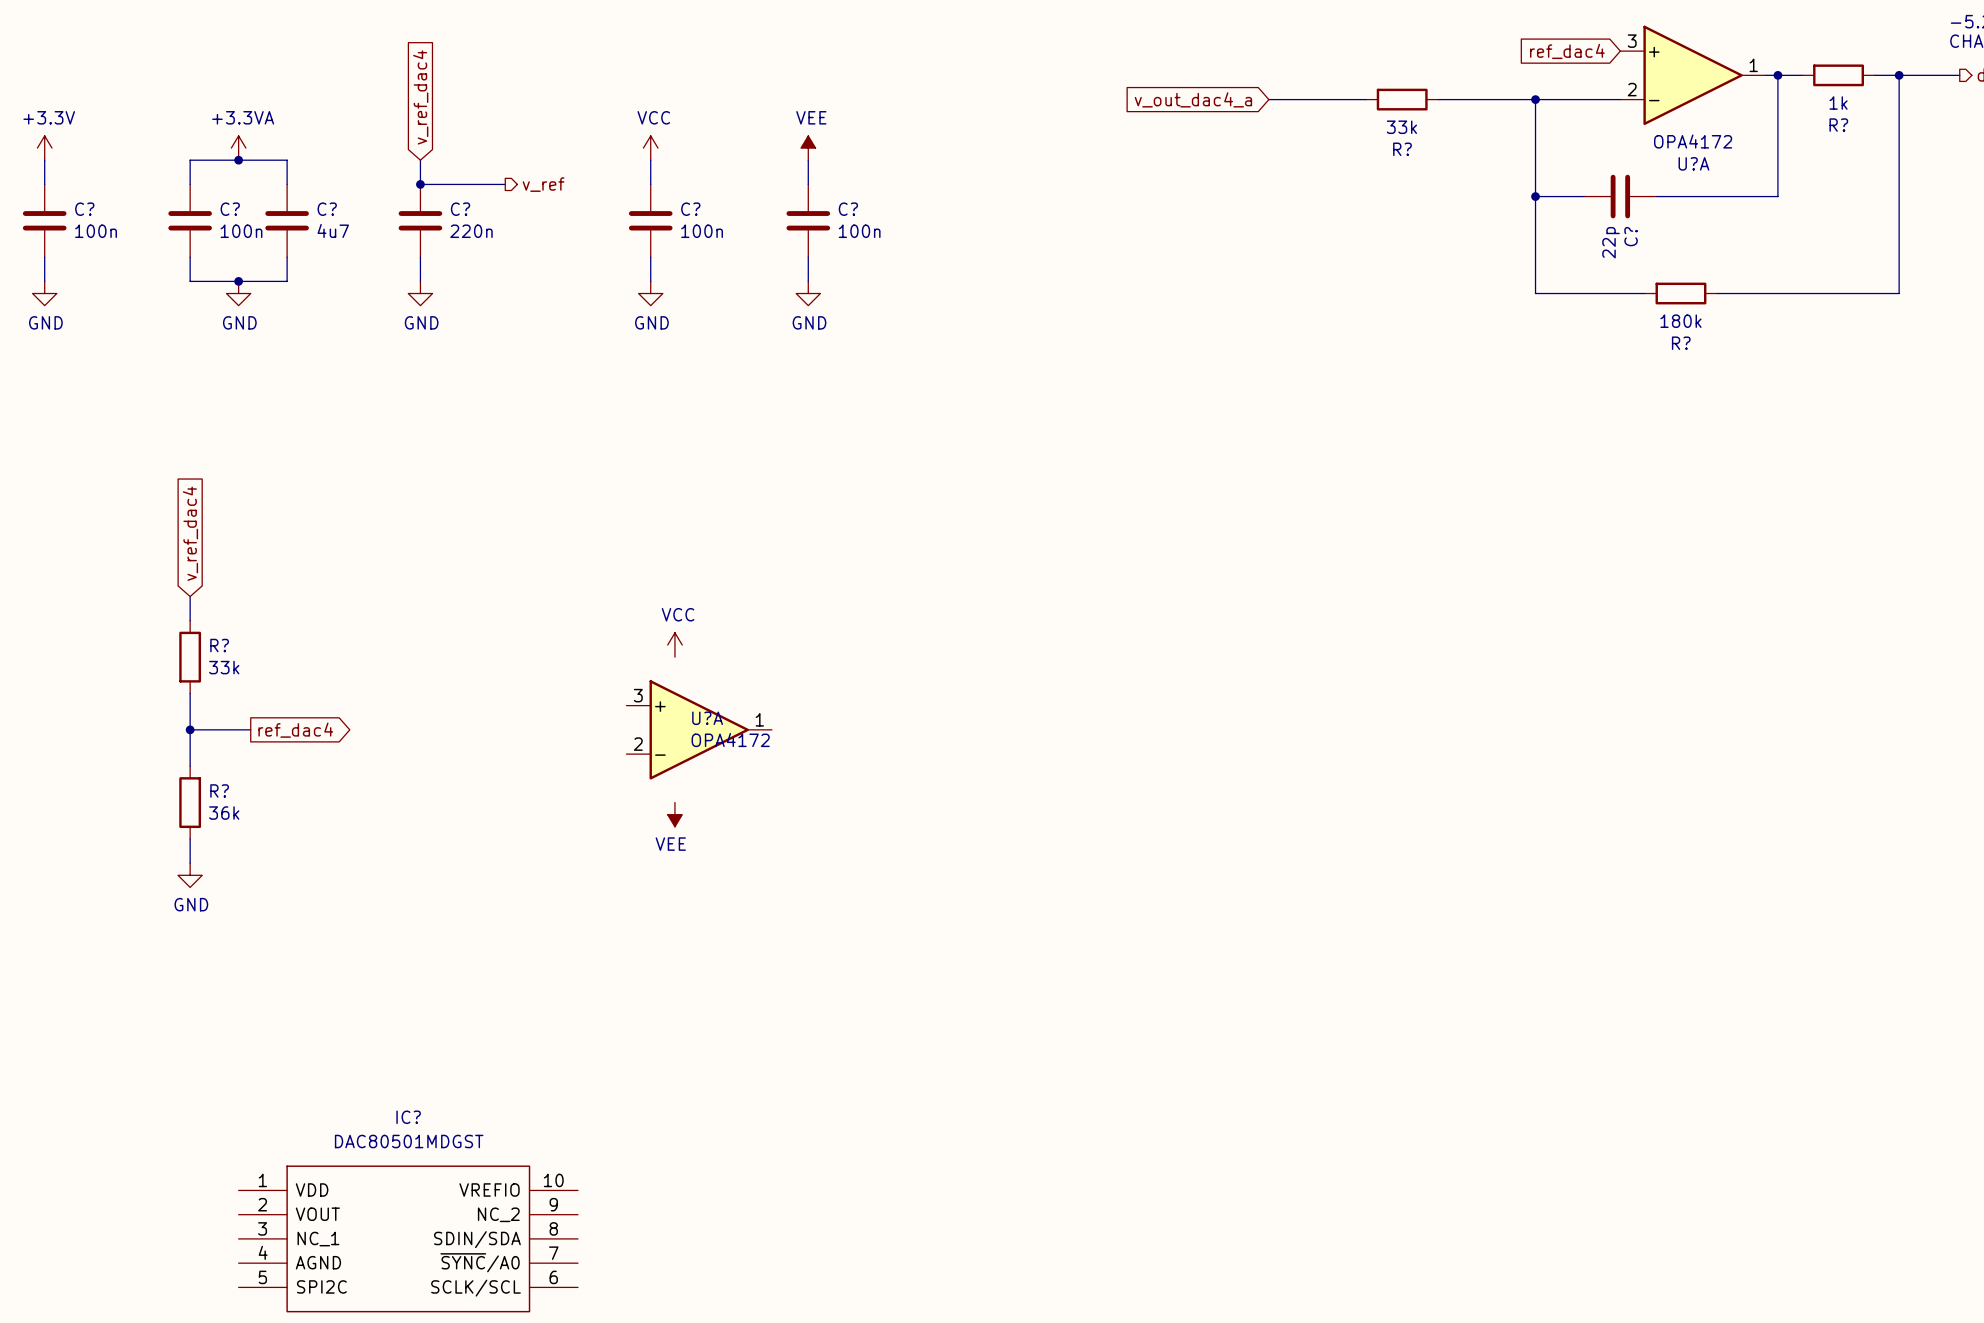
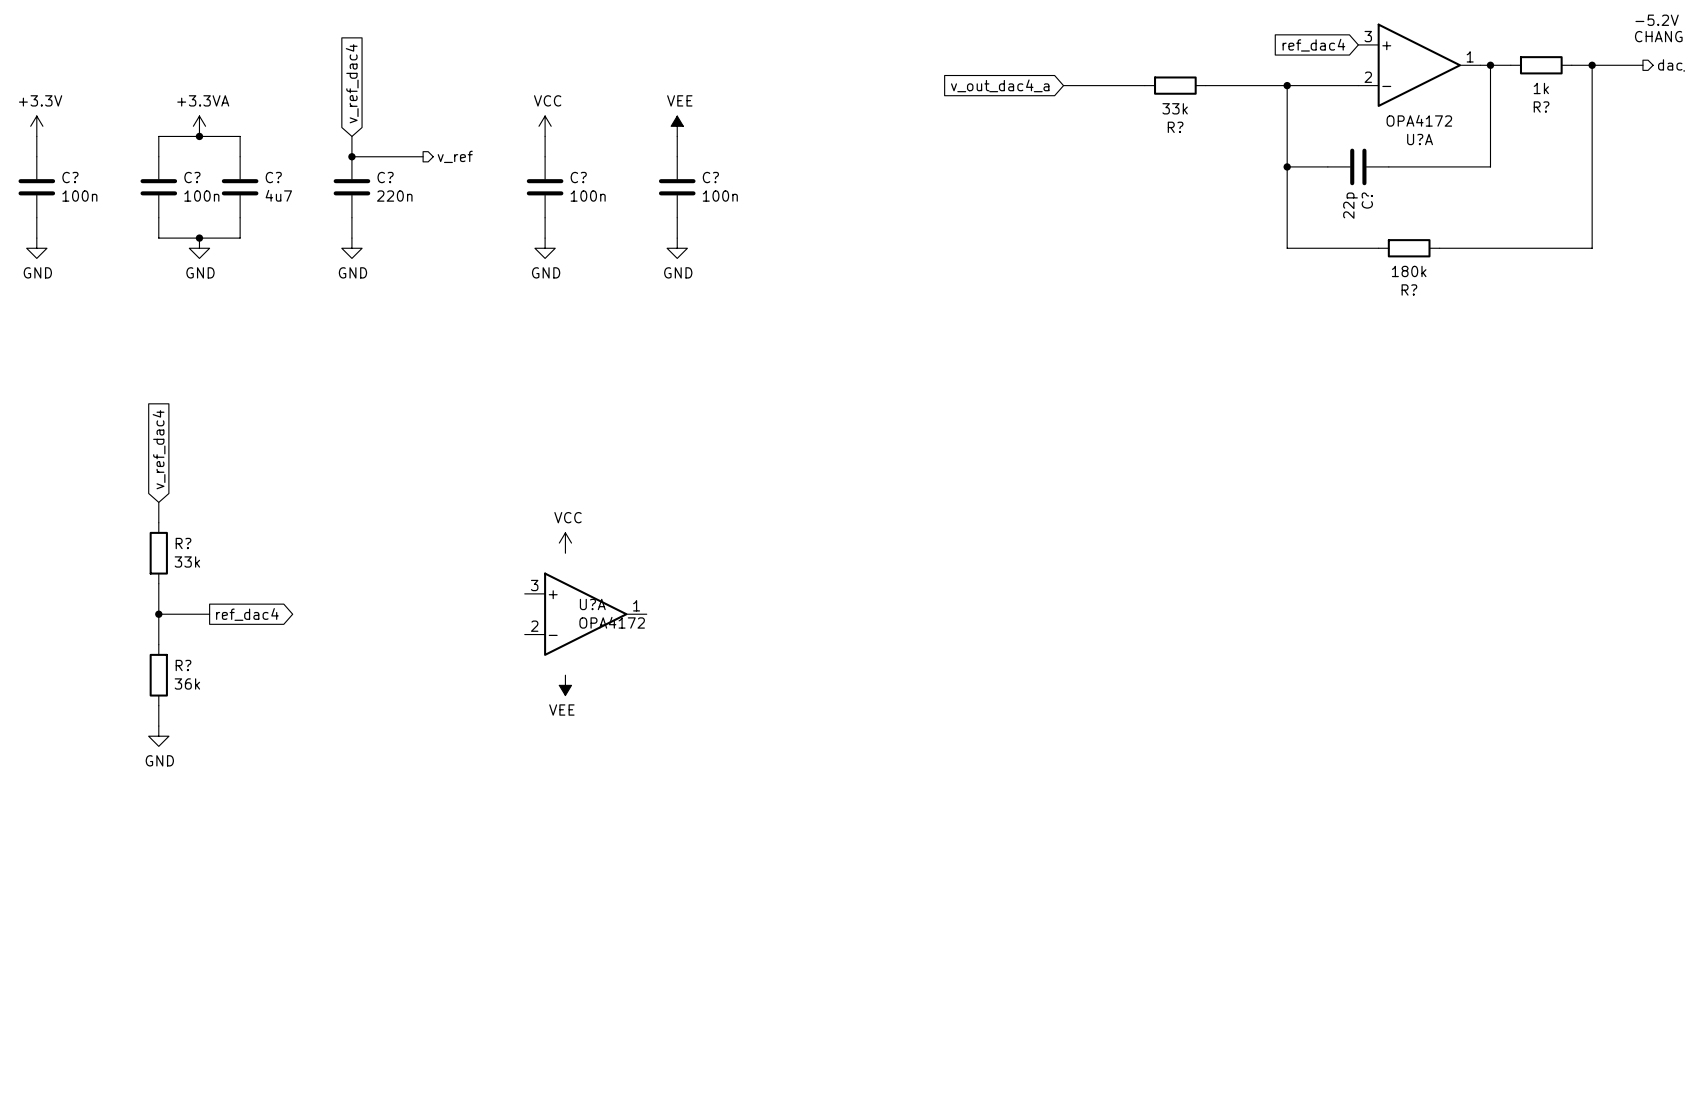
IC?: DAC80501MDGST (408, 1238) -> none

